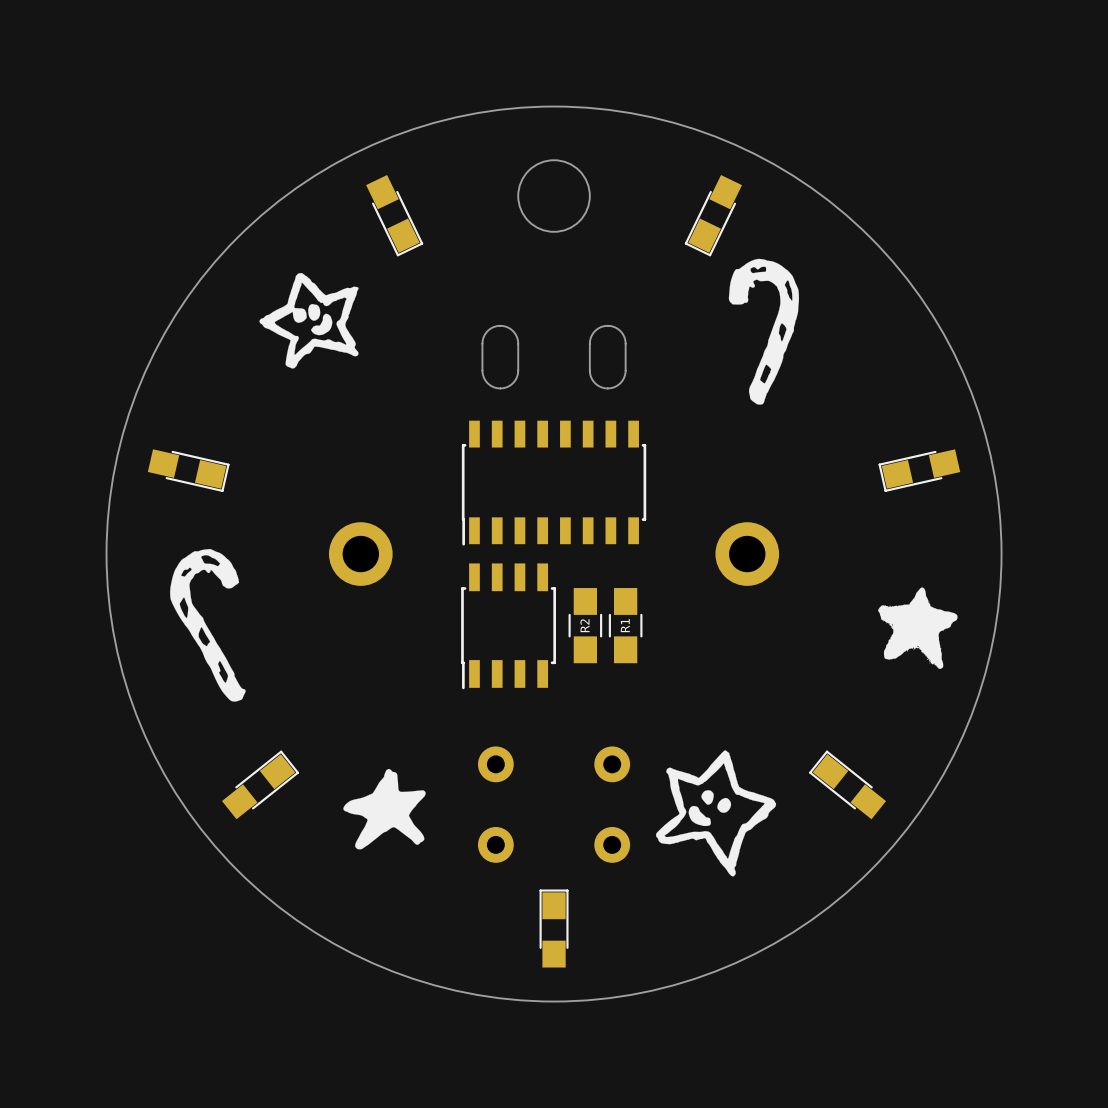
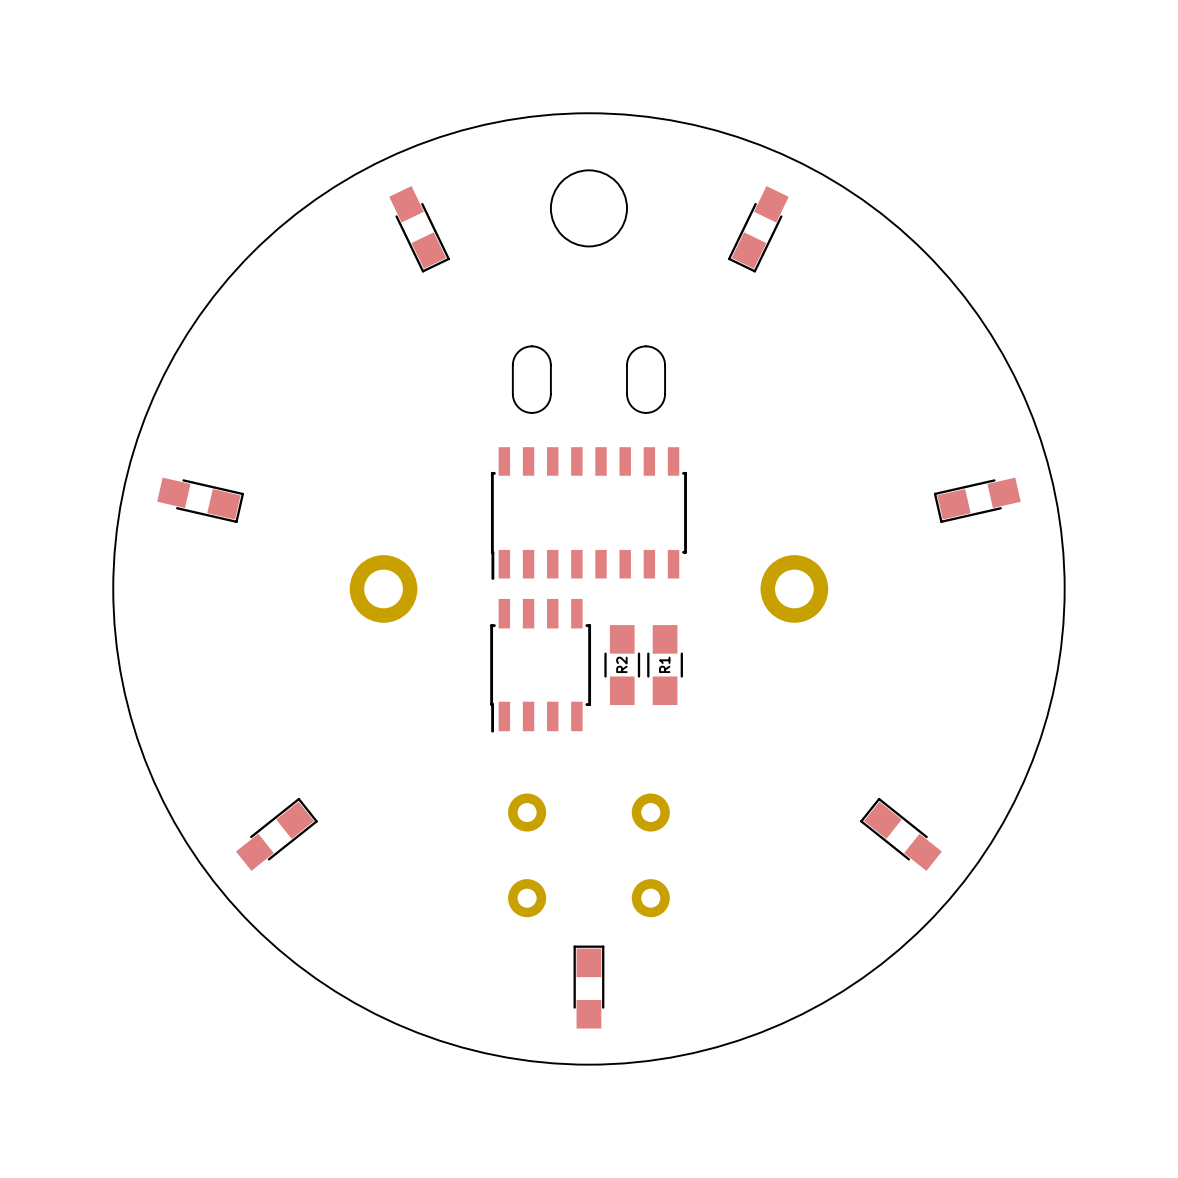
drawing: [170, 258, 958, 877] -> none

